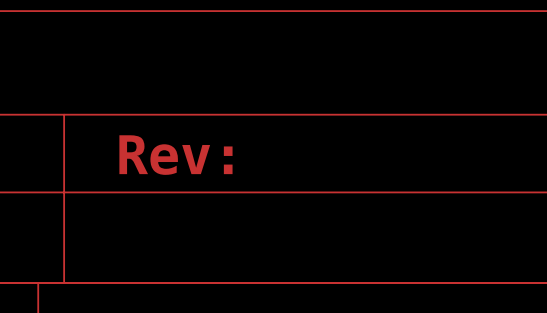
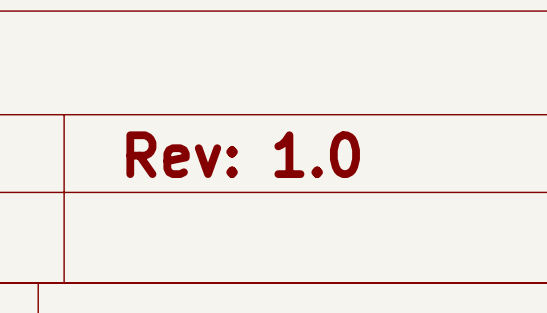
title block: Rev: (175, 155) -> Rev: 1.0 (243, 154)

